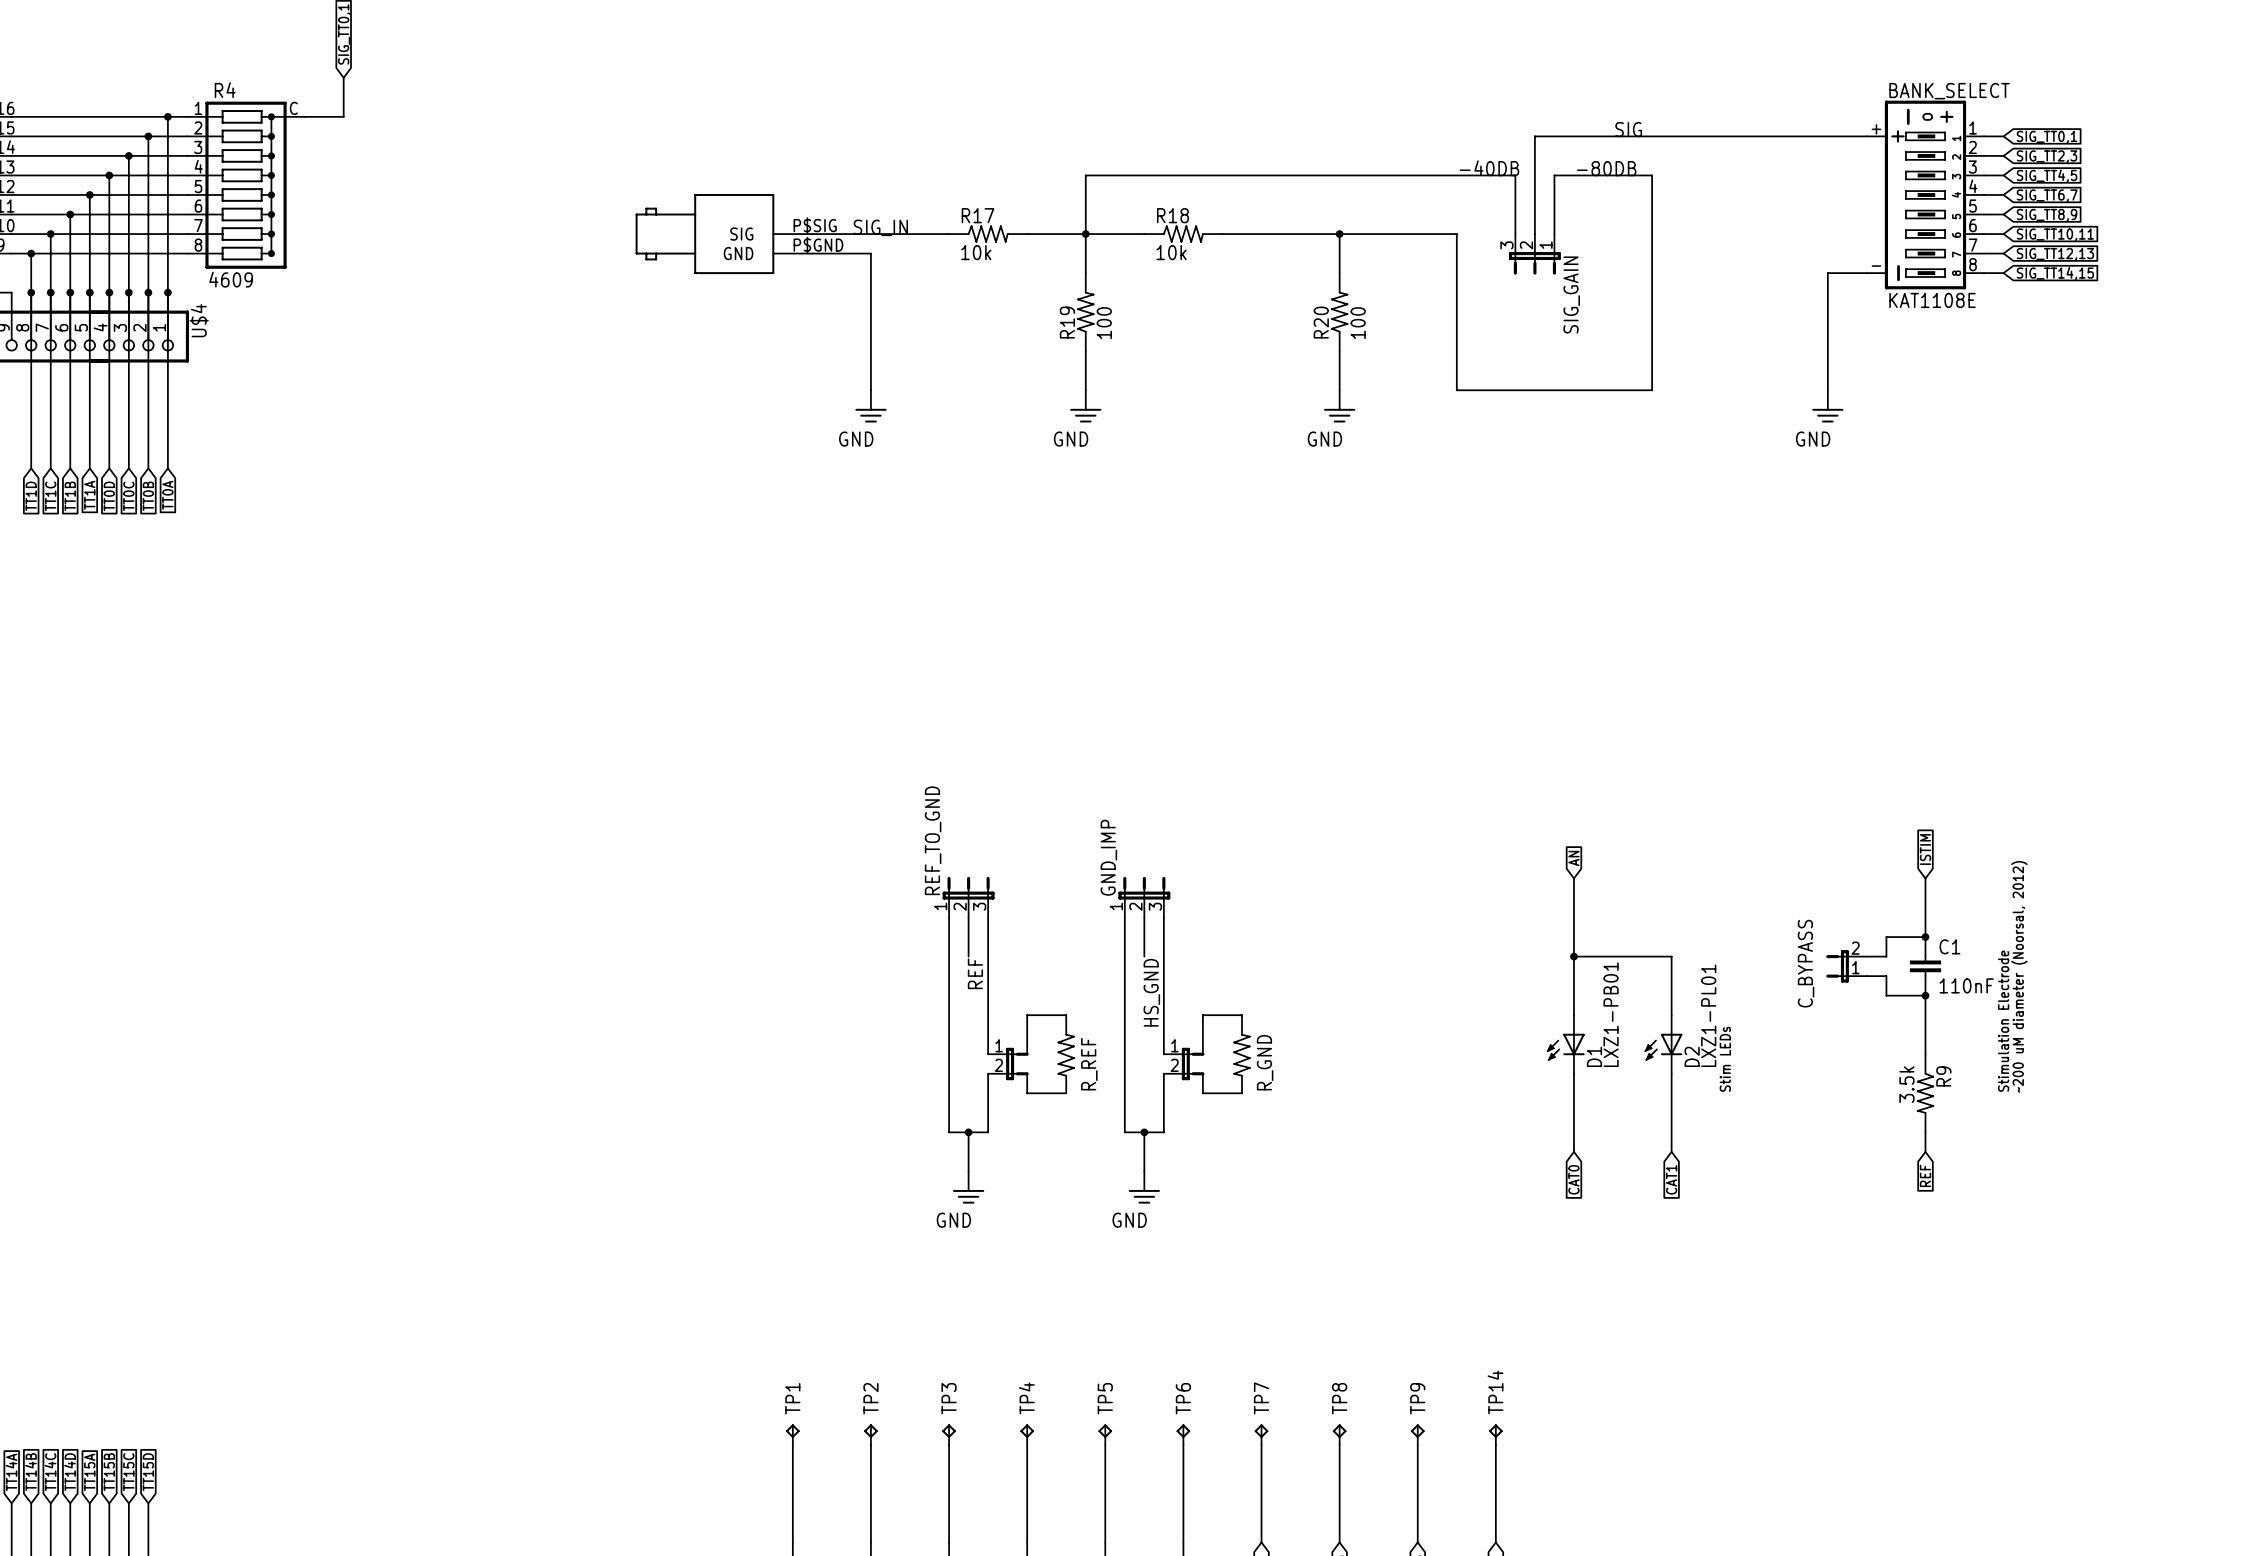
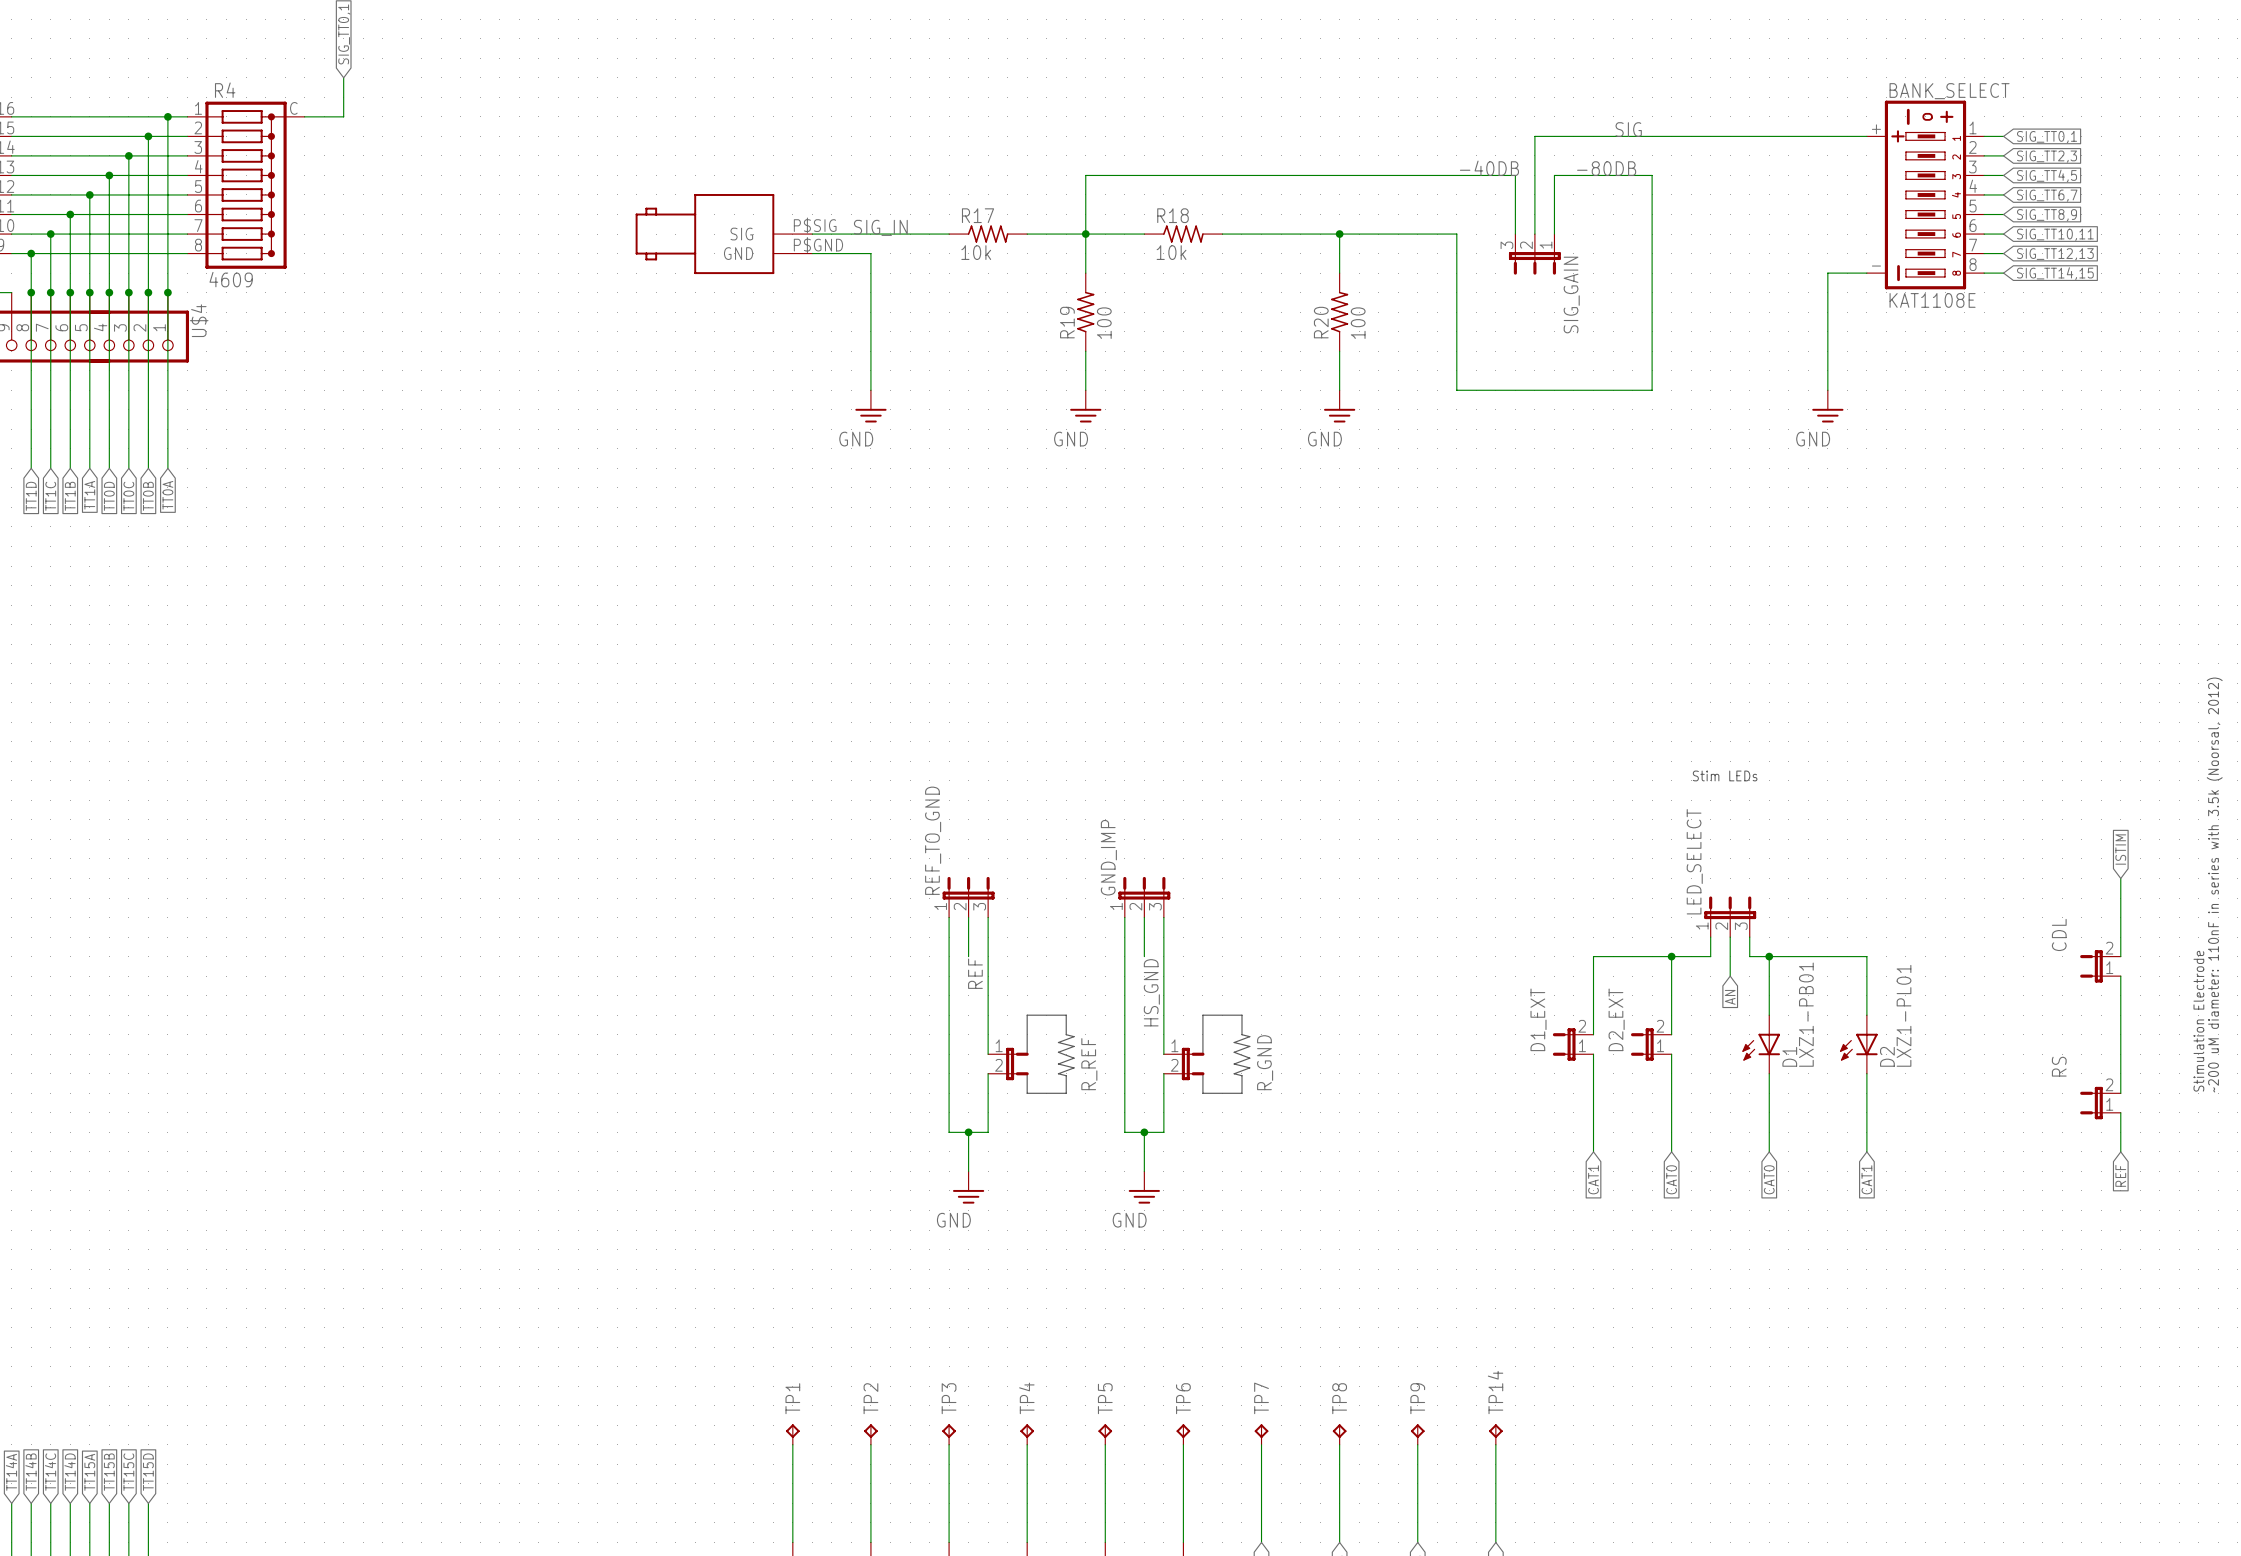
text: none -> Stim LEDs (1725, 775)
global label: ISTIM (1925, 849) -> none
global label: none -> ISTIM (2120, 849)
global label rotation: 0° (1573, 858) -> 180° (1730, 997)
global label position: AN (1573, 858) -> AN (1730, 997)
wire: (1573, 878) (1573, 1015) -> none
wire: (1925, 878) (1925, 937) (1886, 937) (1886, 956) (1866, 956) -> none
wire: none -> (2120, 878) (2120, 956)
text: none -> ~200 uM diameter: 110nF in series with 3.5k (Noorsal, 2012) (2214, 885)
LED_SELECT: none -> (1730, 916)
wire: none -> (1710, 937) (1710, 956) (1671, 956)
wire: none -> (1730, 937) (1730, 976)
wire: none -> (1749, 937) (1749, 956) (1866, 956) (1866, 1015)
junction: (1925, 937) -> none
wire: (1573, 956) (1593, 956) -> (1593, 1034) (1593, 956)
junction: (1573, 956) -> none
junction: none -> (1671, 956)
wire: none -> (1769, 956) (1769, 1015)
junction: none -> (1769, 956)
C_BYPASS: (1846, 966) -> none
C1: 110nF (1925, 966) -> none
CDL: none -> (2100, 966)
wire: (1866, 976) (1886, 976) (1886, 995) (1925, 995) (1925, 1054) -> none
text: ~200 uM diameter (Noorsal, 2012) (2019, 976) -> none
wire: none -> (2120, 976) (2120, 1093)
junction: (1925, 995) -> none
text: Stimulation Electrode (2003, 1021) -> none
text: none -> Stimulation Electrode (2198, 1021)
D1 position: (1565, 1044) -> (1761, 1044)
D1_EXT: none -> (1573, 1044)
D2_EXT: none -> (1651, 1044)
D2 position: (1663, 1044) -> (1858, 1044)
wire: none -> (1593, 1054) (1593, 1151)
text: Stim LEDs (1725, 1059) -> none
wire: (1573, 1073) (1573, 1151) -> none
wire: none -> (1769, 1073) (1769, 1151)
wire: none -> (1866, 1073) (1866, 1151)
R9: 3.5k (1925, 1093) -> none
RS: none -> (2100, 1103)
wire: none -> (2120, 1112) (2120, 1151)
wire: (1925, 1132) (1925, 1151) -> none
global label: REF (1925, 1175) -> none
global label: none -> REF (2120, 1175)
global label: CAT0 (1573, 1179) -> CAT1 (1593, 1179)
global label: CAT1 (1671, 1179) -> CAT0 (1671, 1179)
global label: none -> CAT0 (1769, 1179)
global label: none -> CAT1 (1866, 1179)

